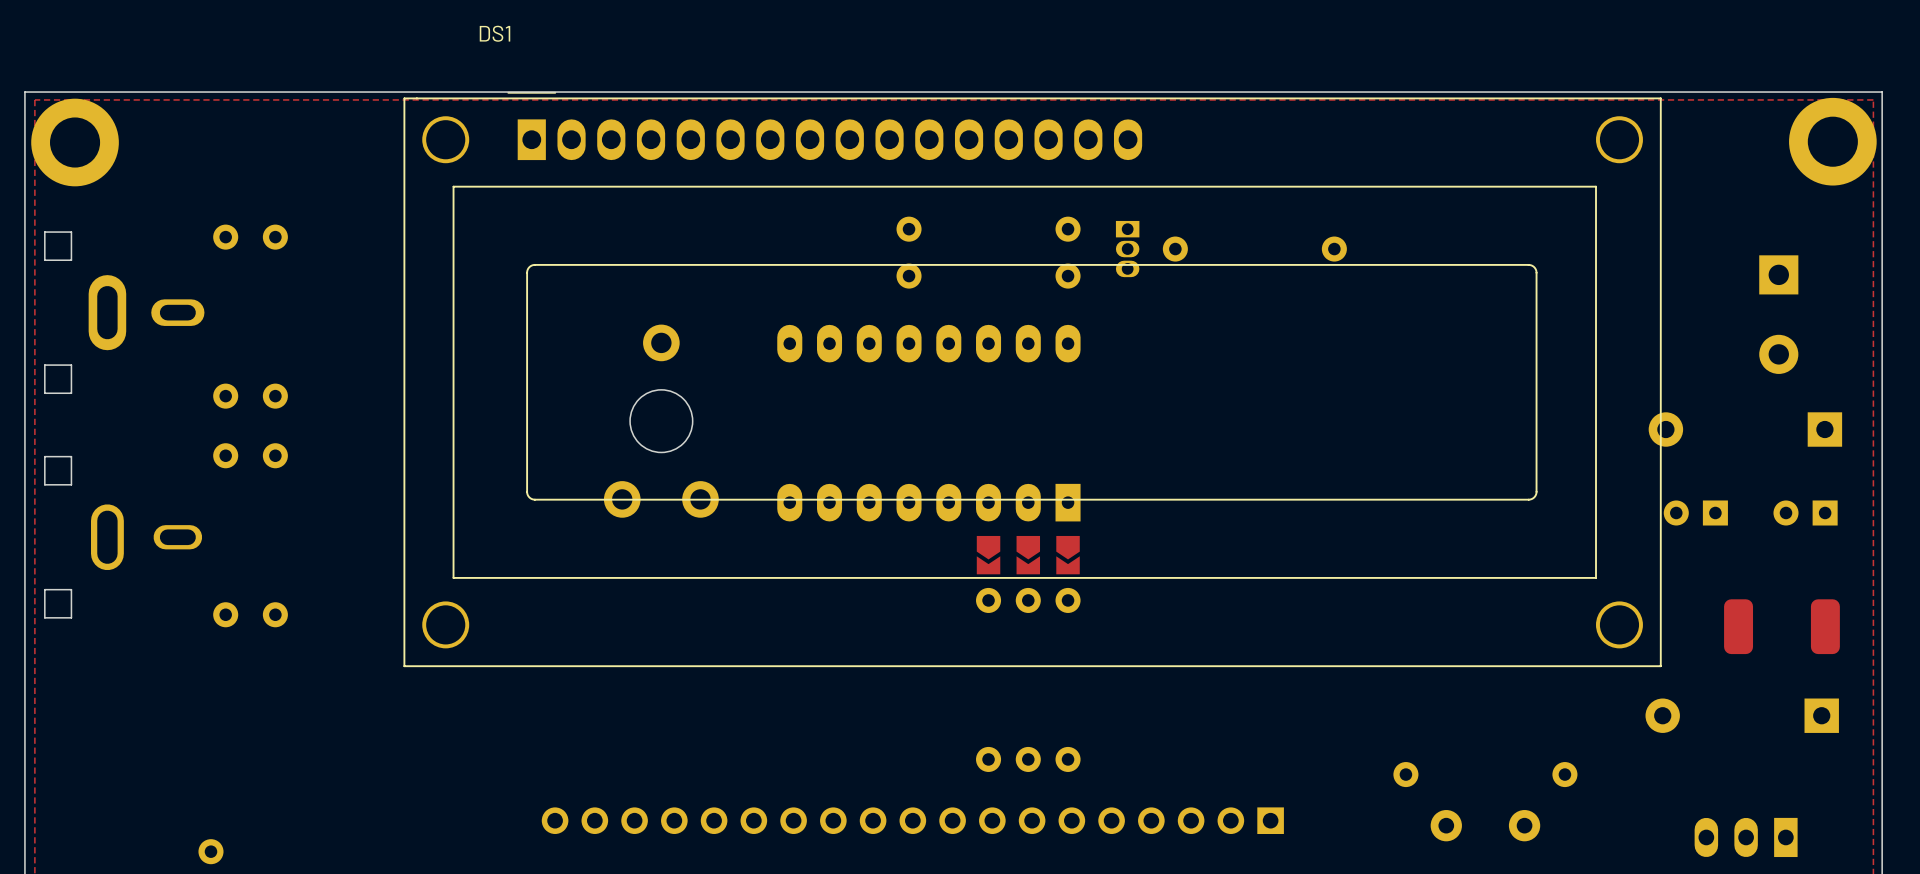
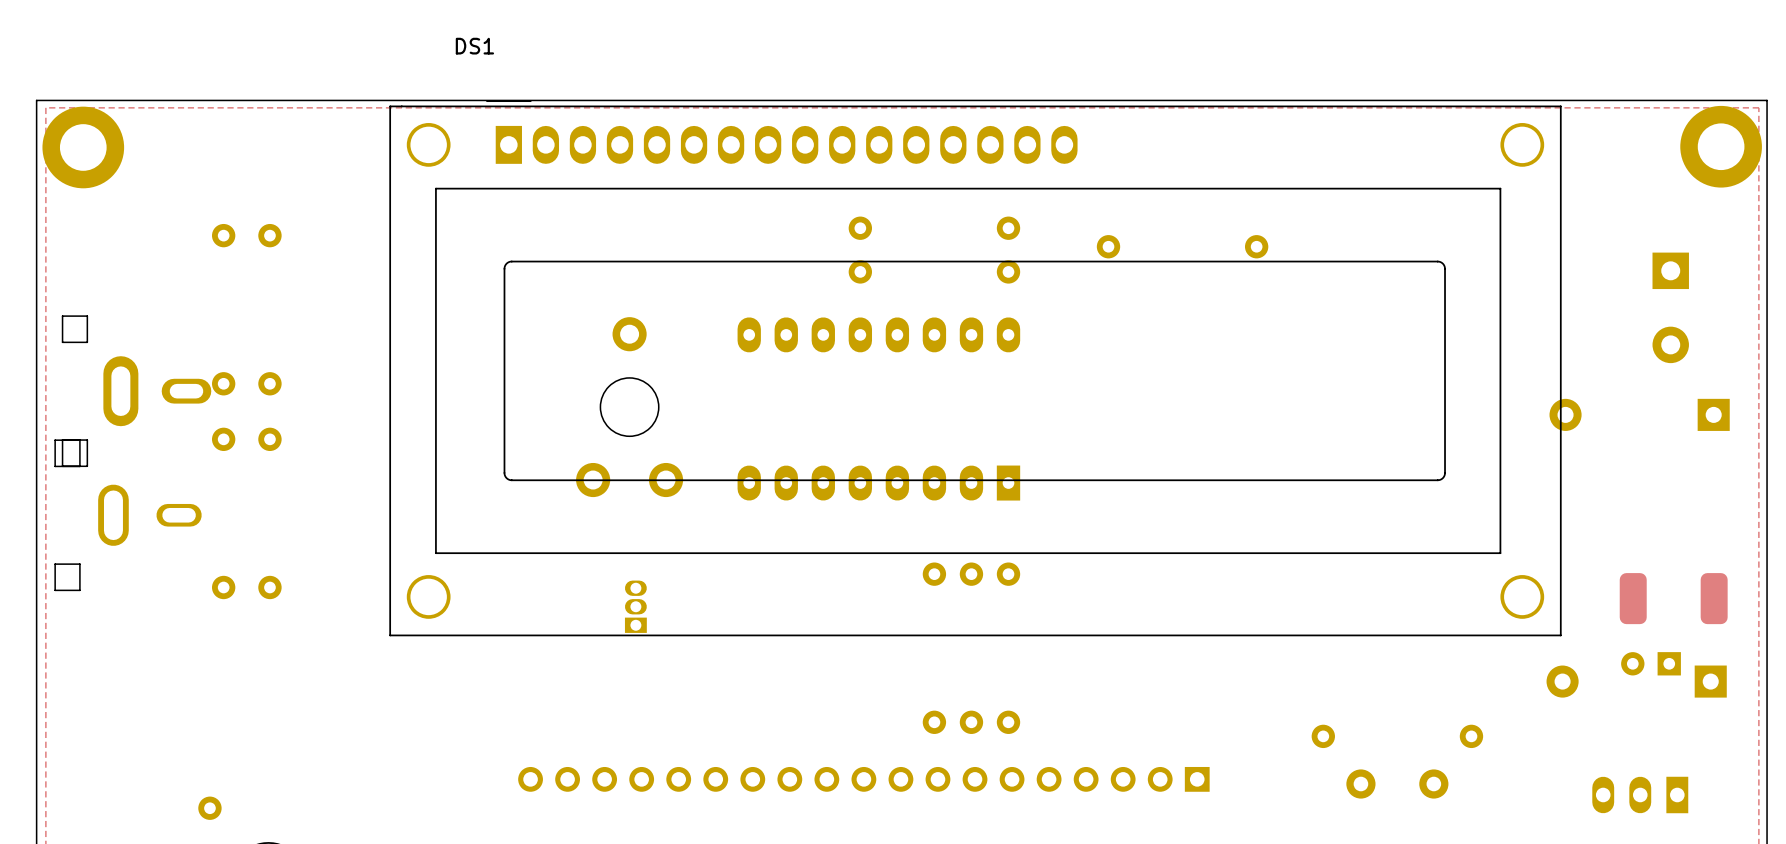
part: (1127, 249) -> none
part position: (124, 312) -> (136, 391)
part: (1695, 512) -> none
part: (1805, 512) -> none
part: (988, 555) -> none
part: (1028, 555) -> none
part: (1068, 555) -> none
part: none -> (635, 606)
part: none -> (1651, 663)

